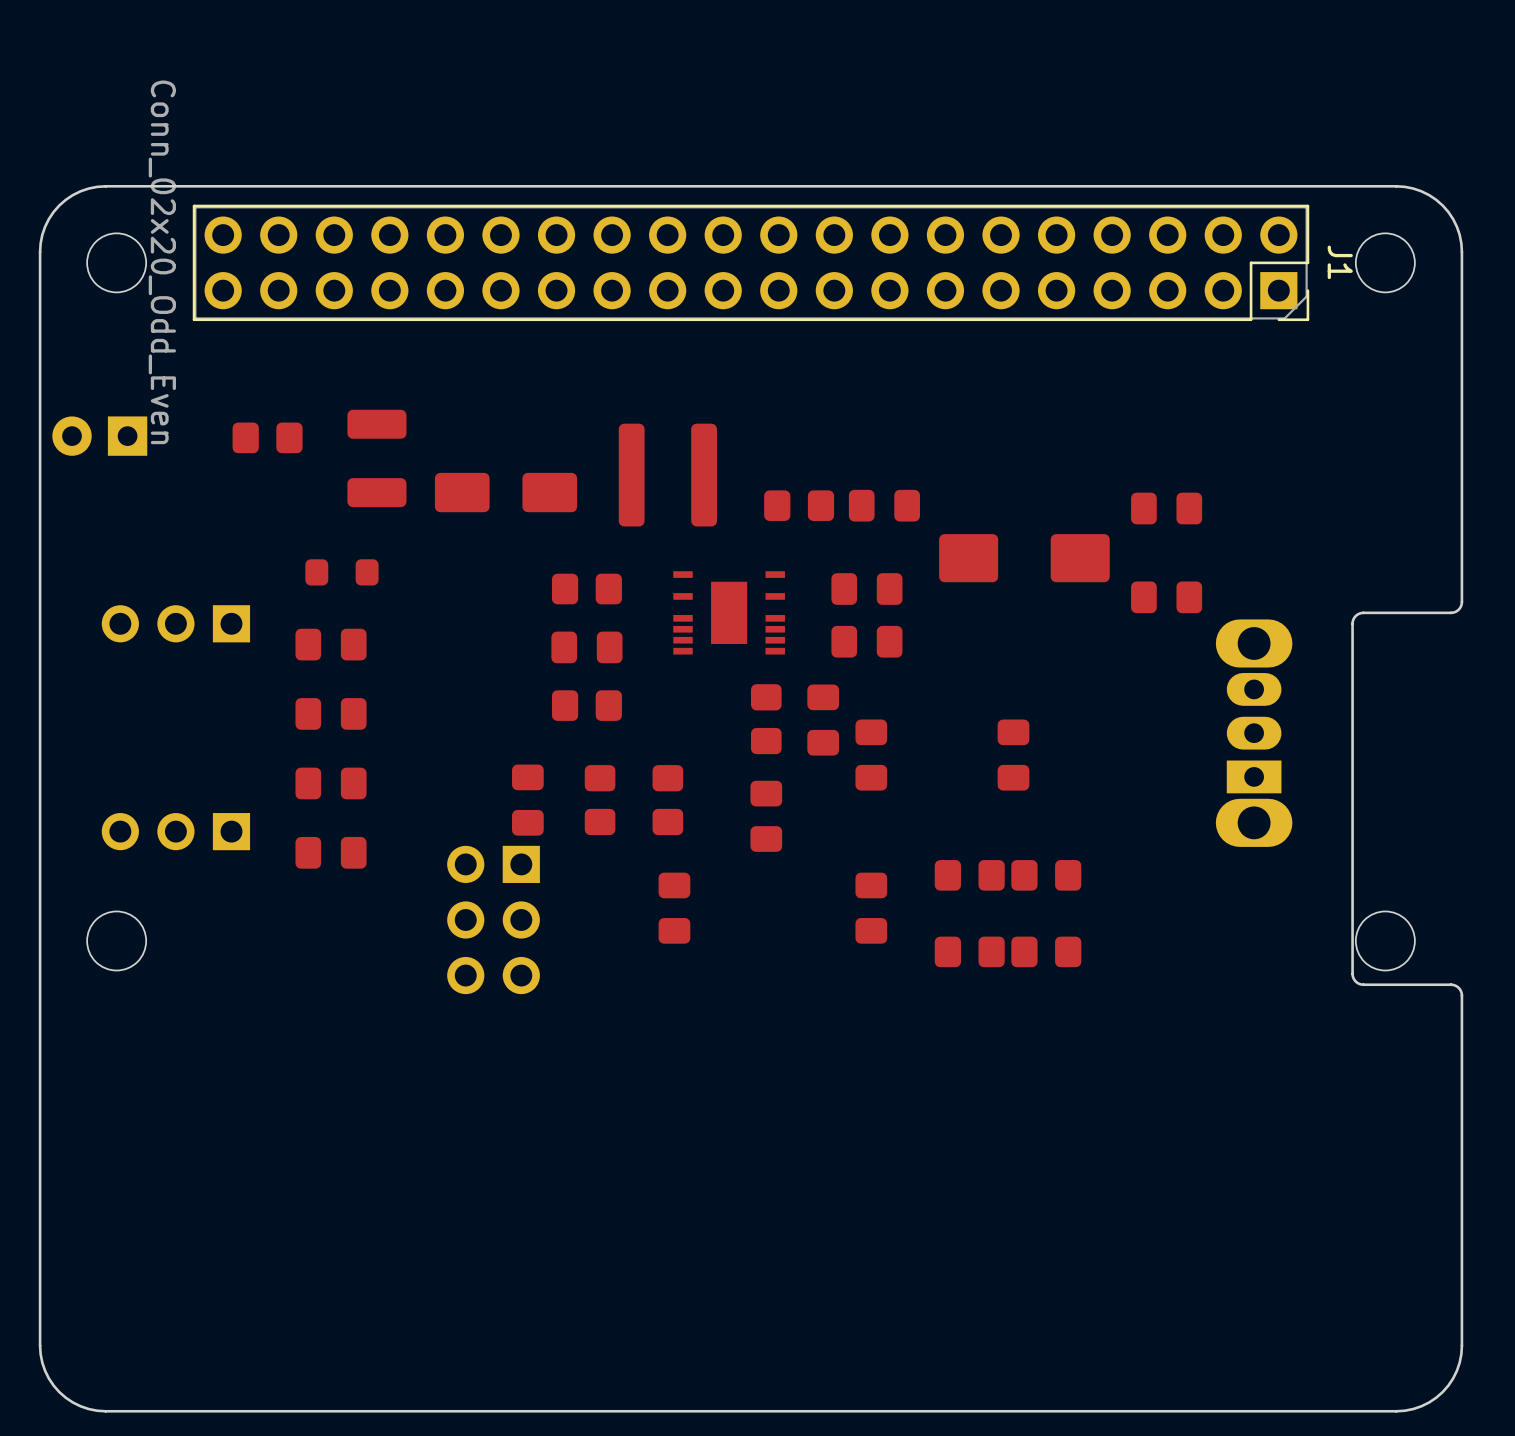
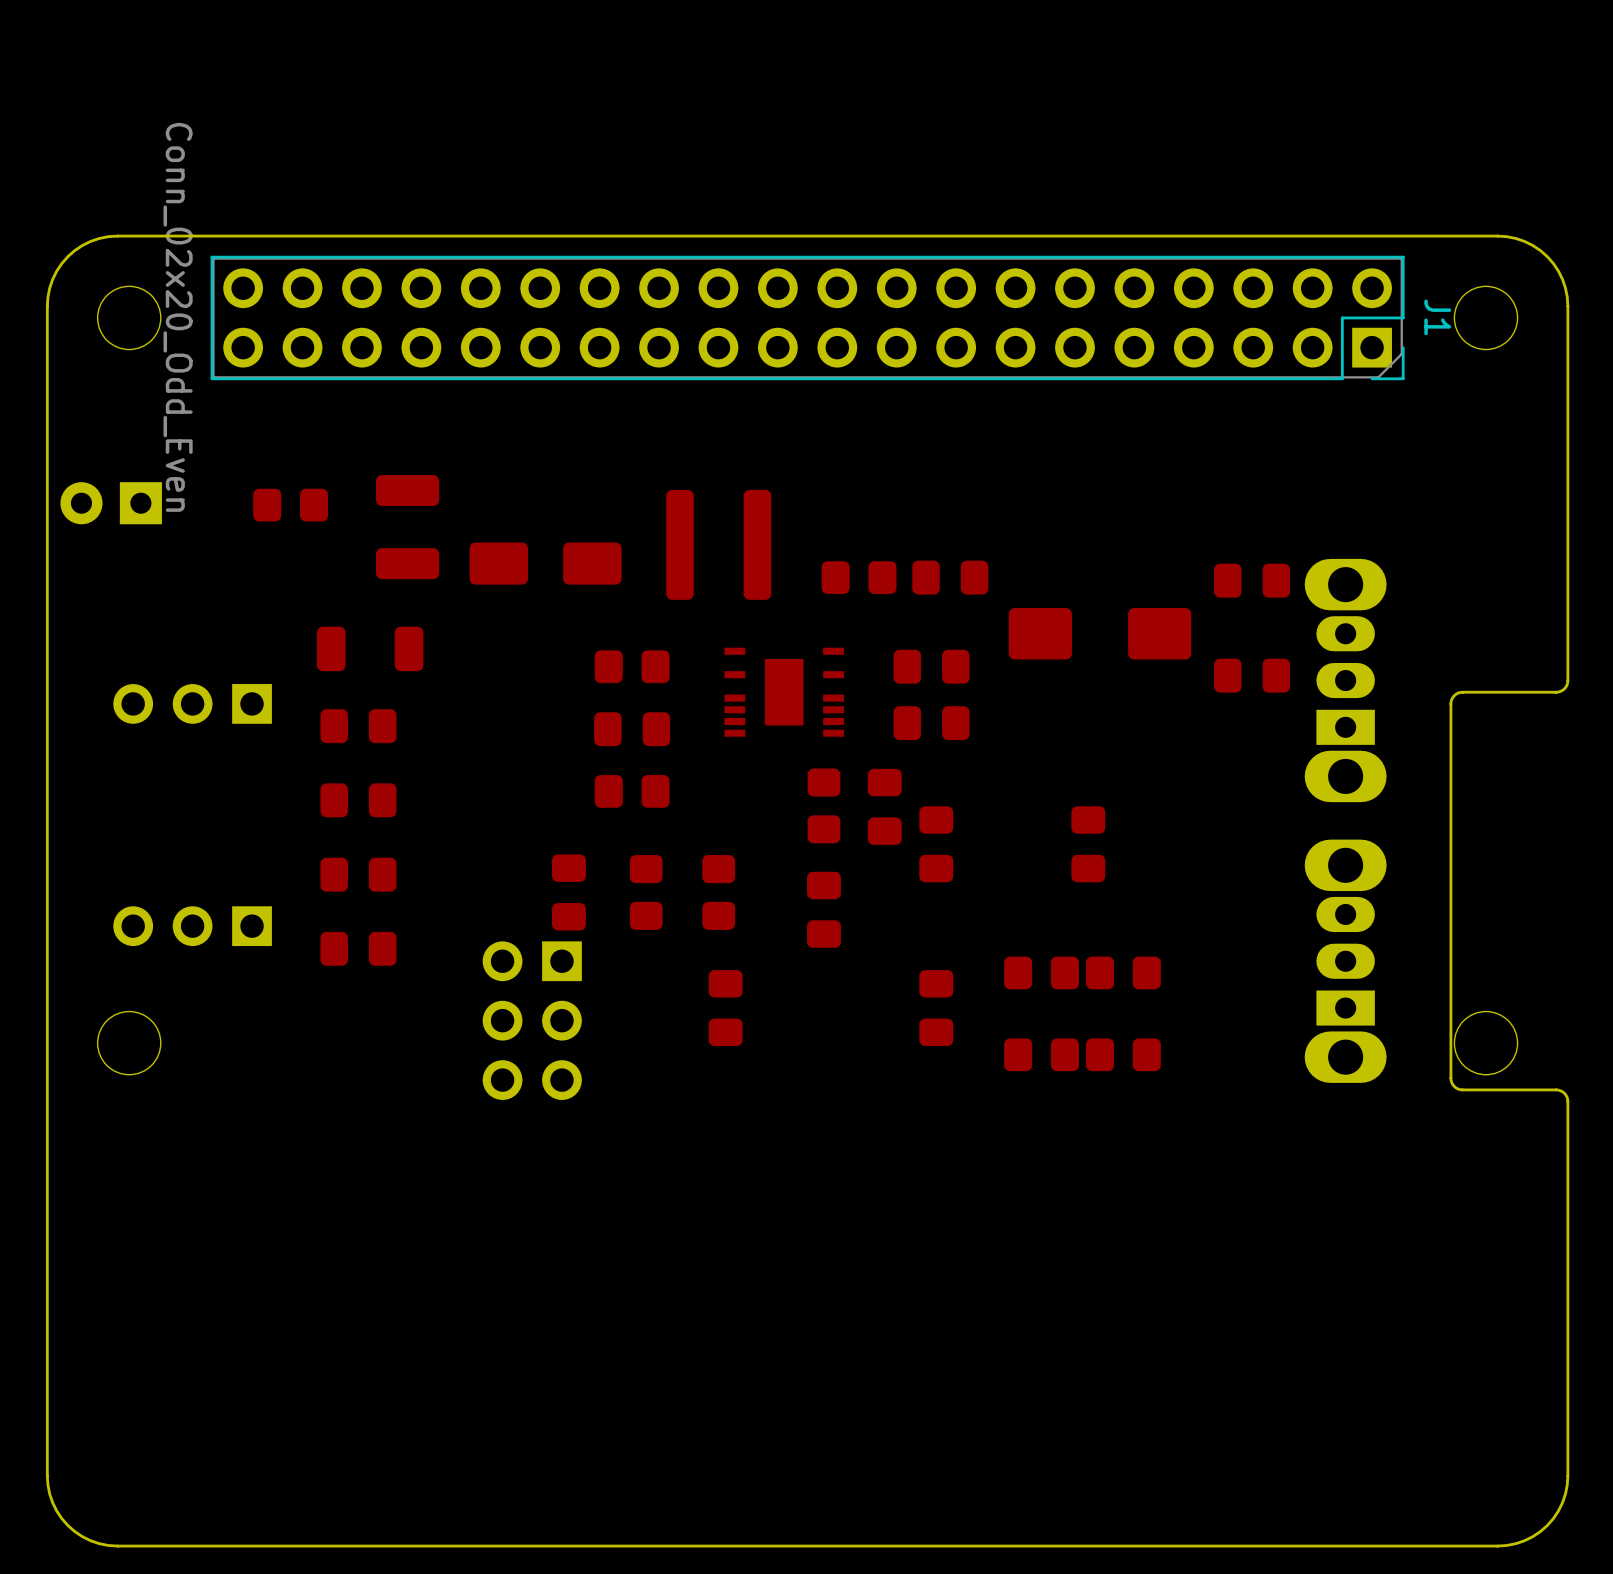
part footprint: [305, 559, 379, 586] -> [316, 626, 424, 672]
part: none -> (1345, 680)
part: (1254, 733) -> none
part: none -> (1345, 961)

